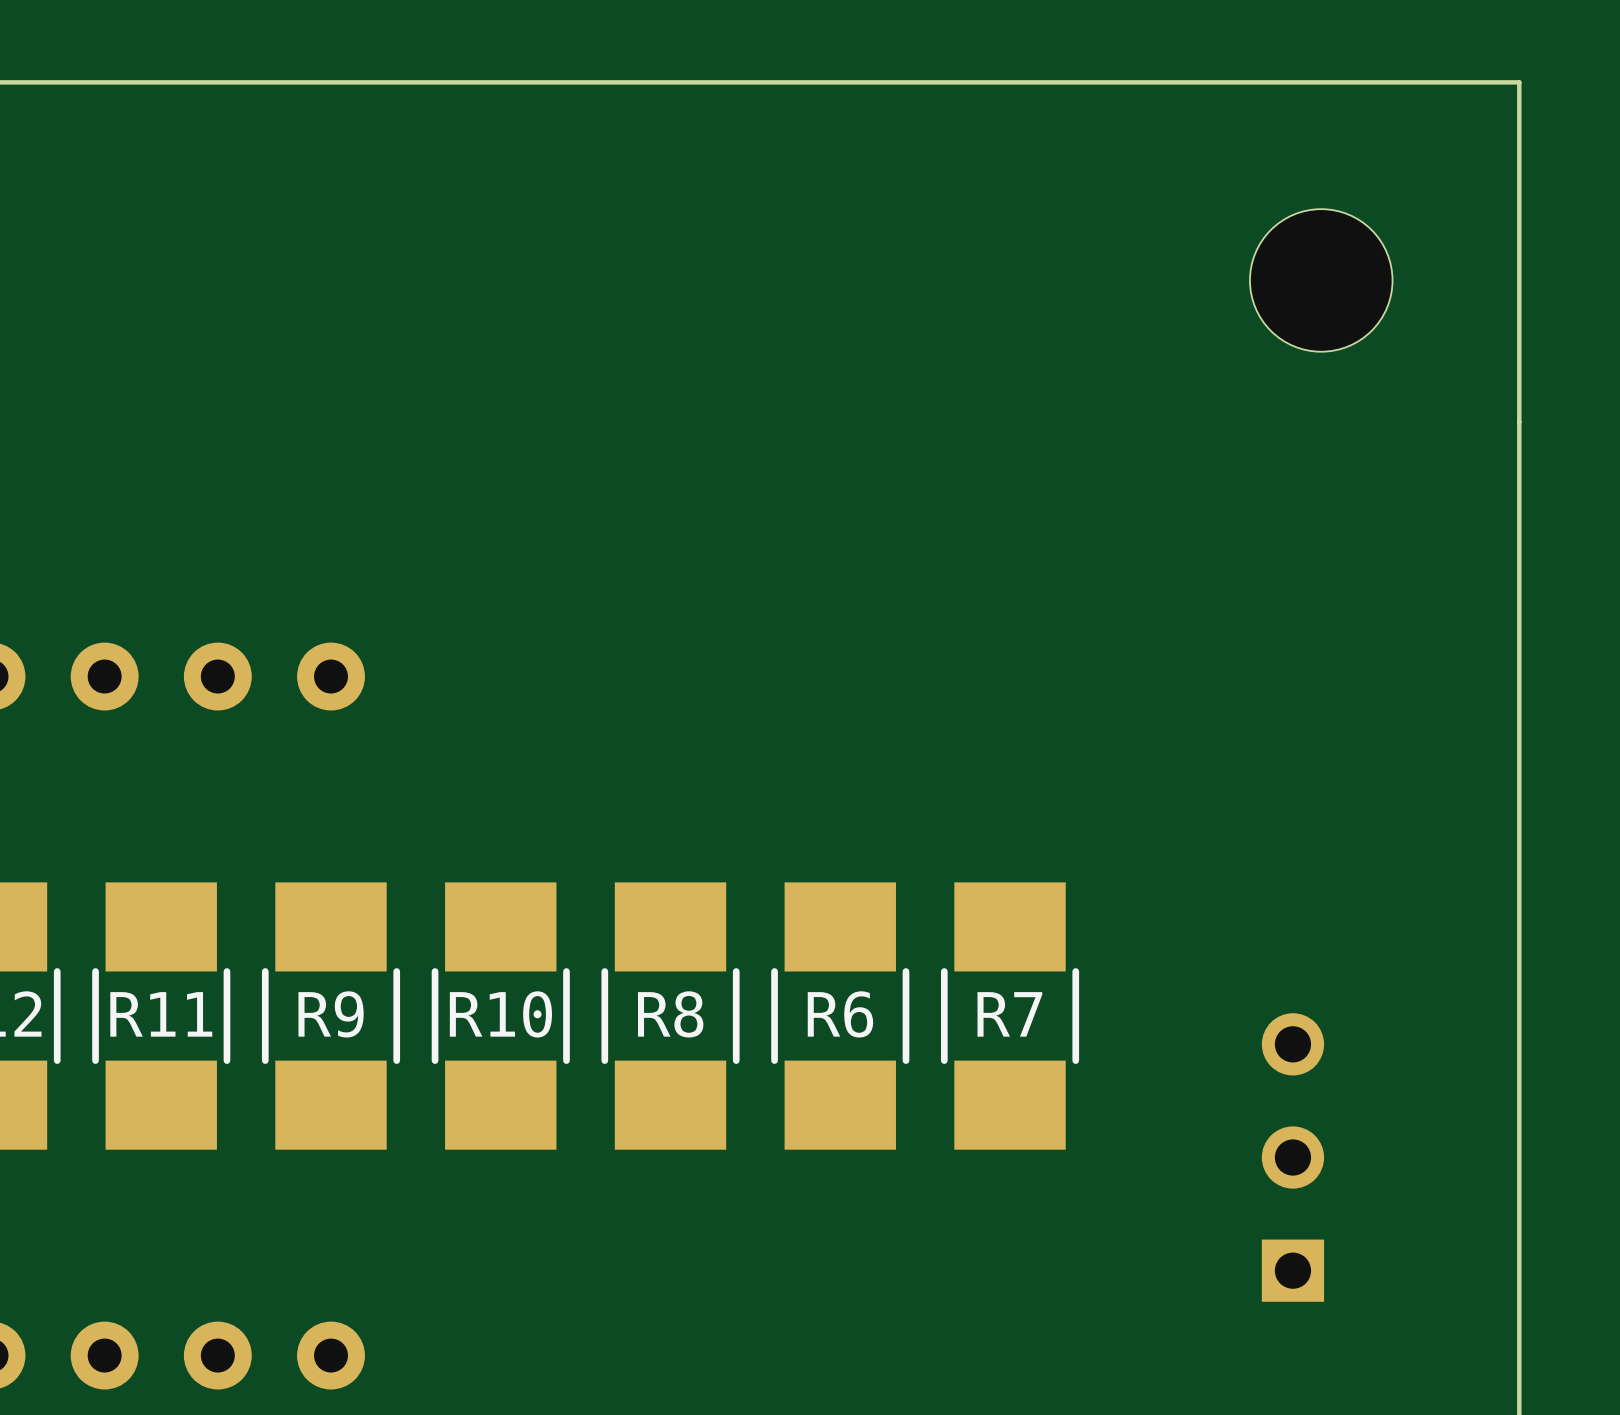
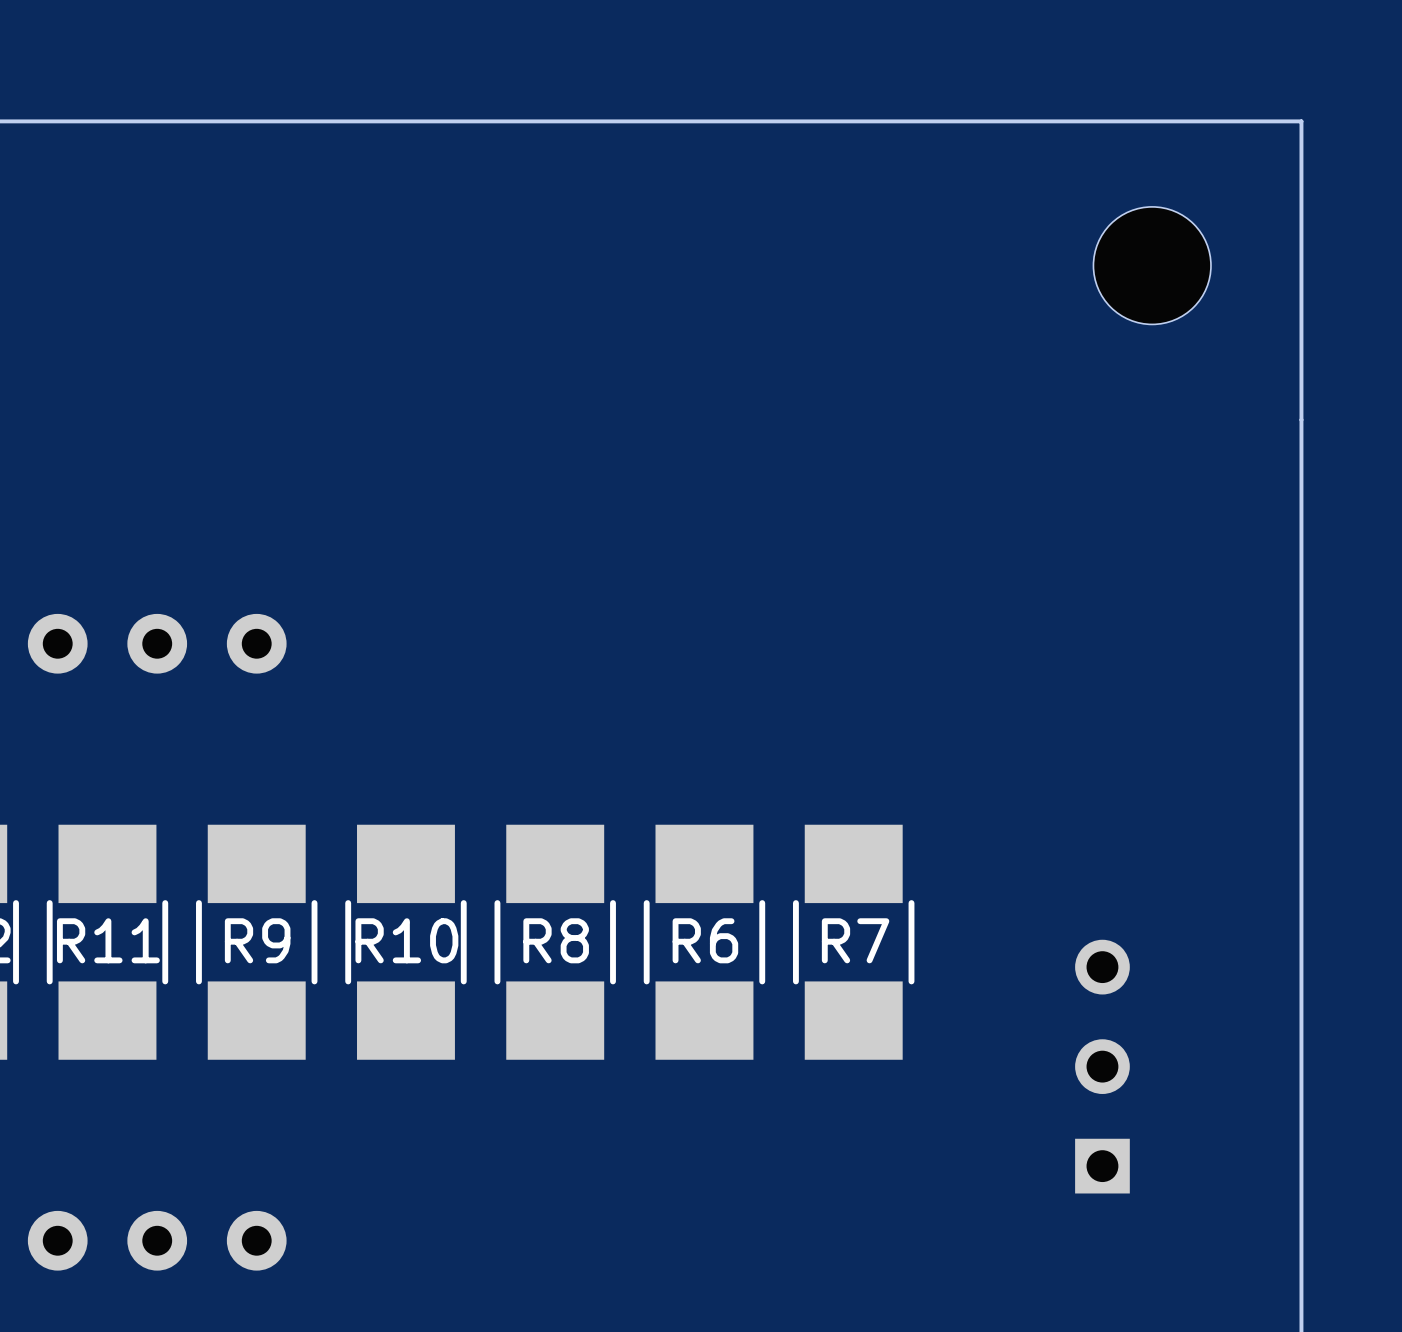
part footprint: [1249, 209, 1393, 352] -> [1093, 206, 1211, 325]

